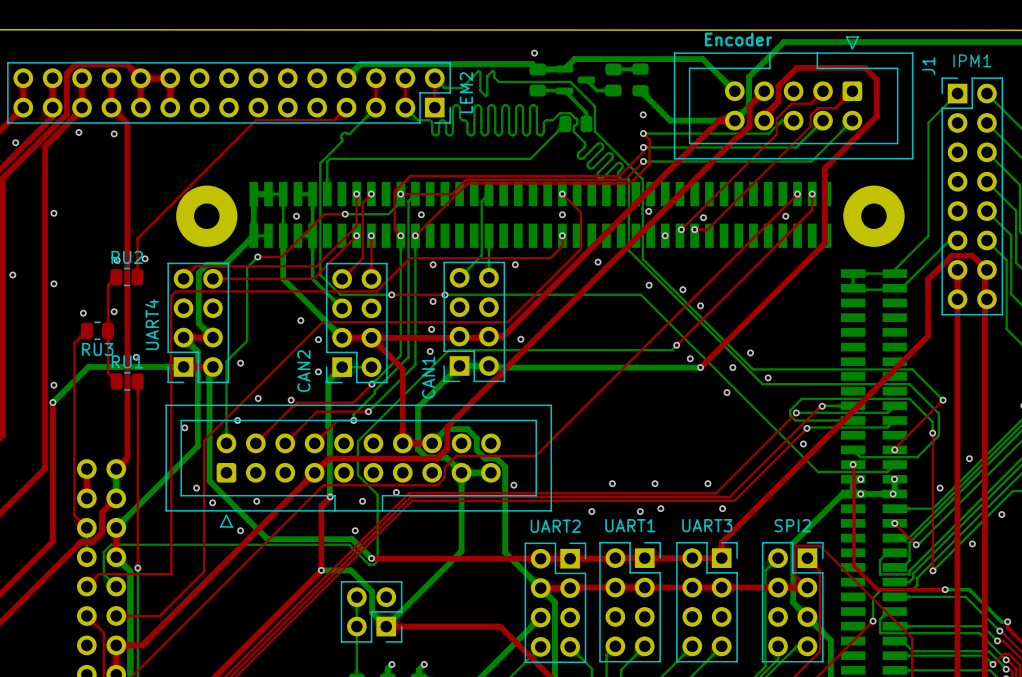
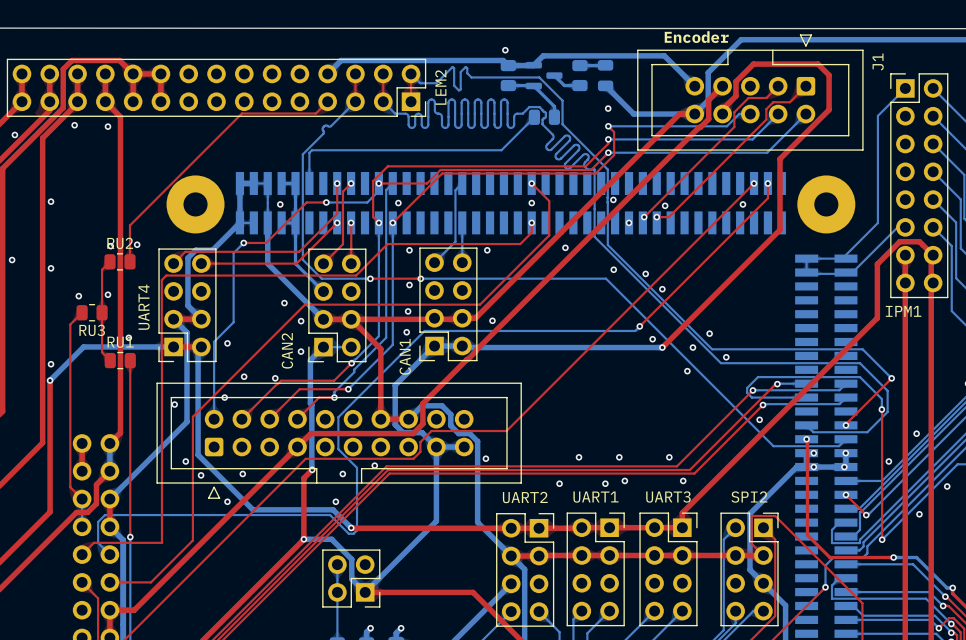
text position: IPM1 (972, 60) -> IPM1 (903, 311)

